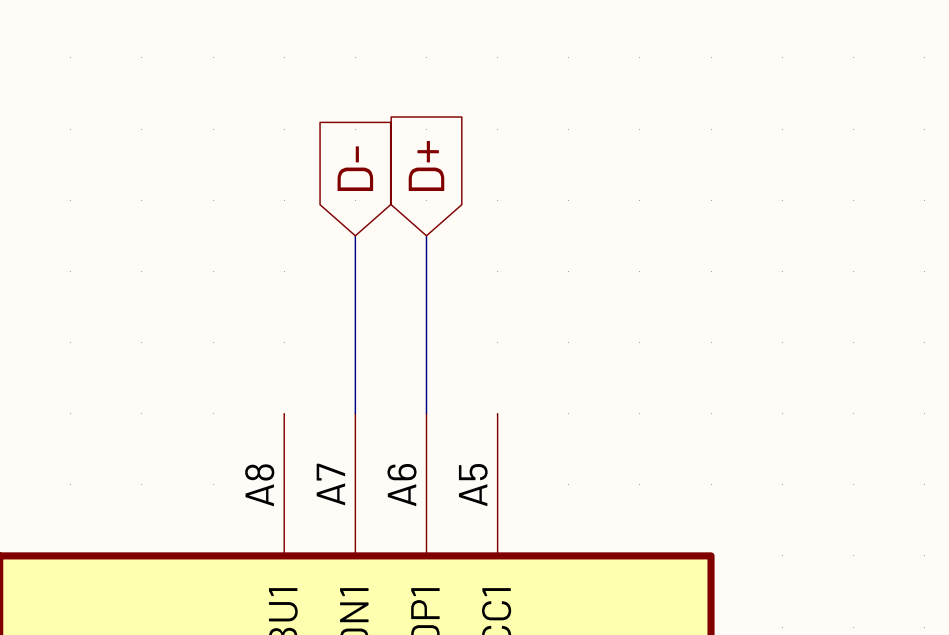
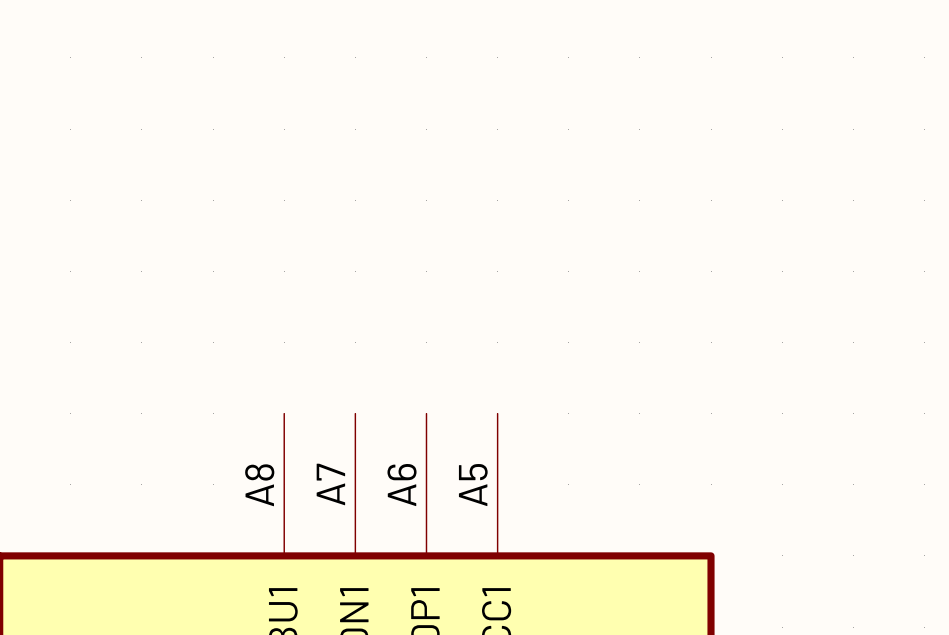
global label: D+ (426, 166) -> none
global label: D- (355, 168) -> none
wire: (355, 235) (355, 413) -> none
wire: (426, 235) (426, 413) -> none

